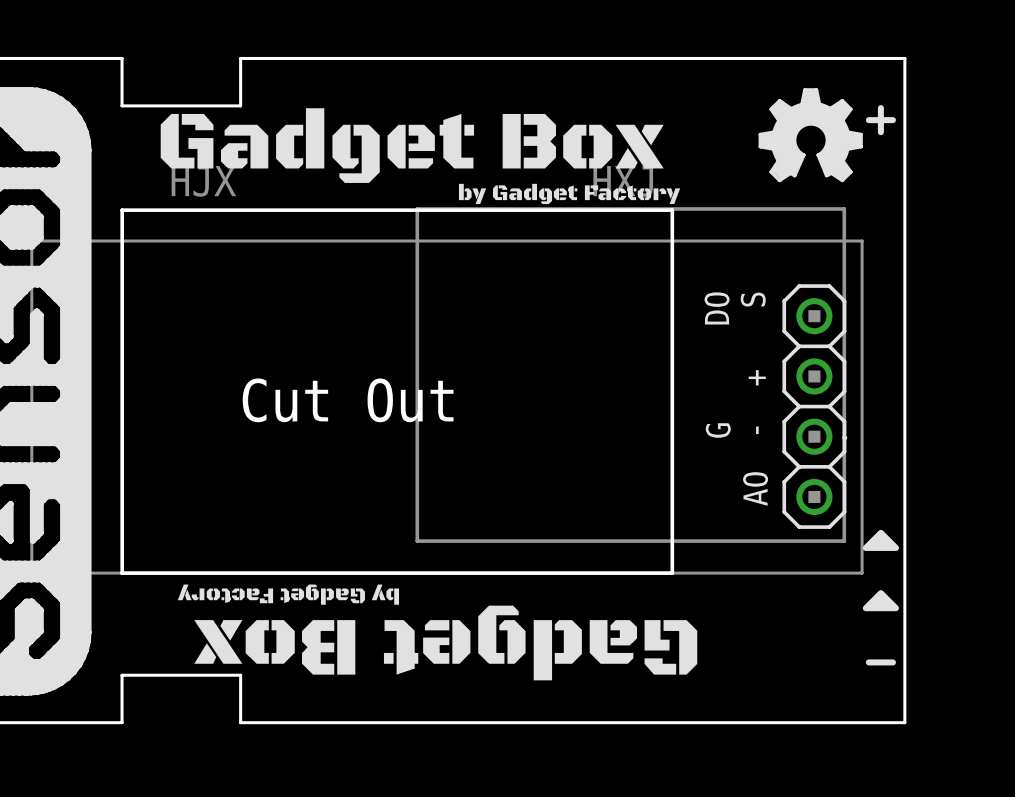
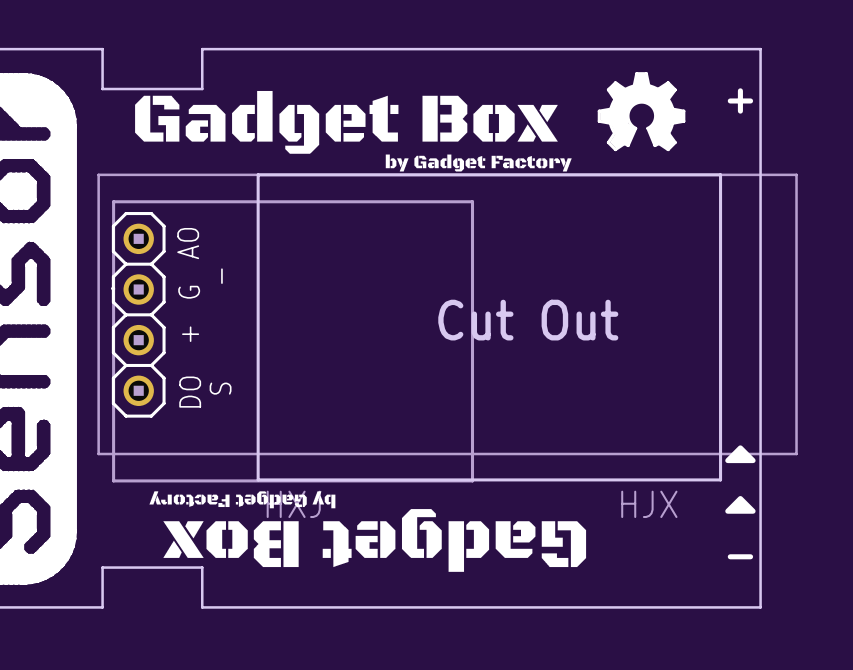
drawing position: (810, 135) -> (641, 111)
part: none -> (447, 327)
part: (446, 391) -> none
text position: Cut Out (348, 400) -> Cut Out (528, 320)

